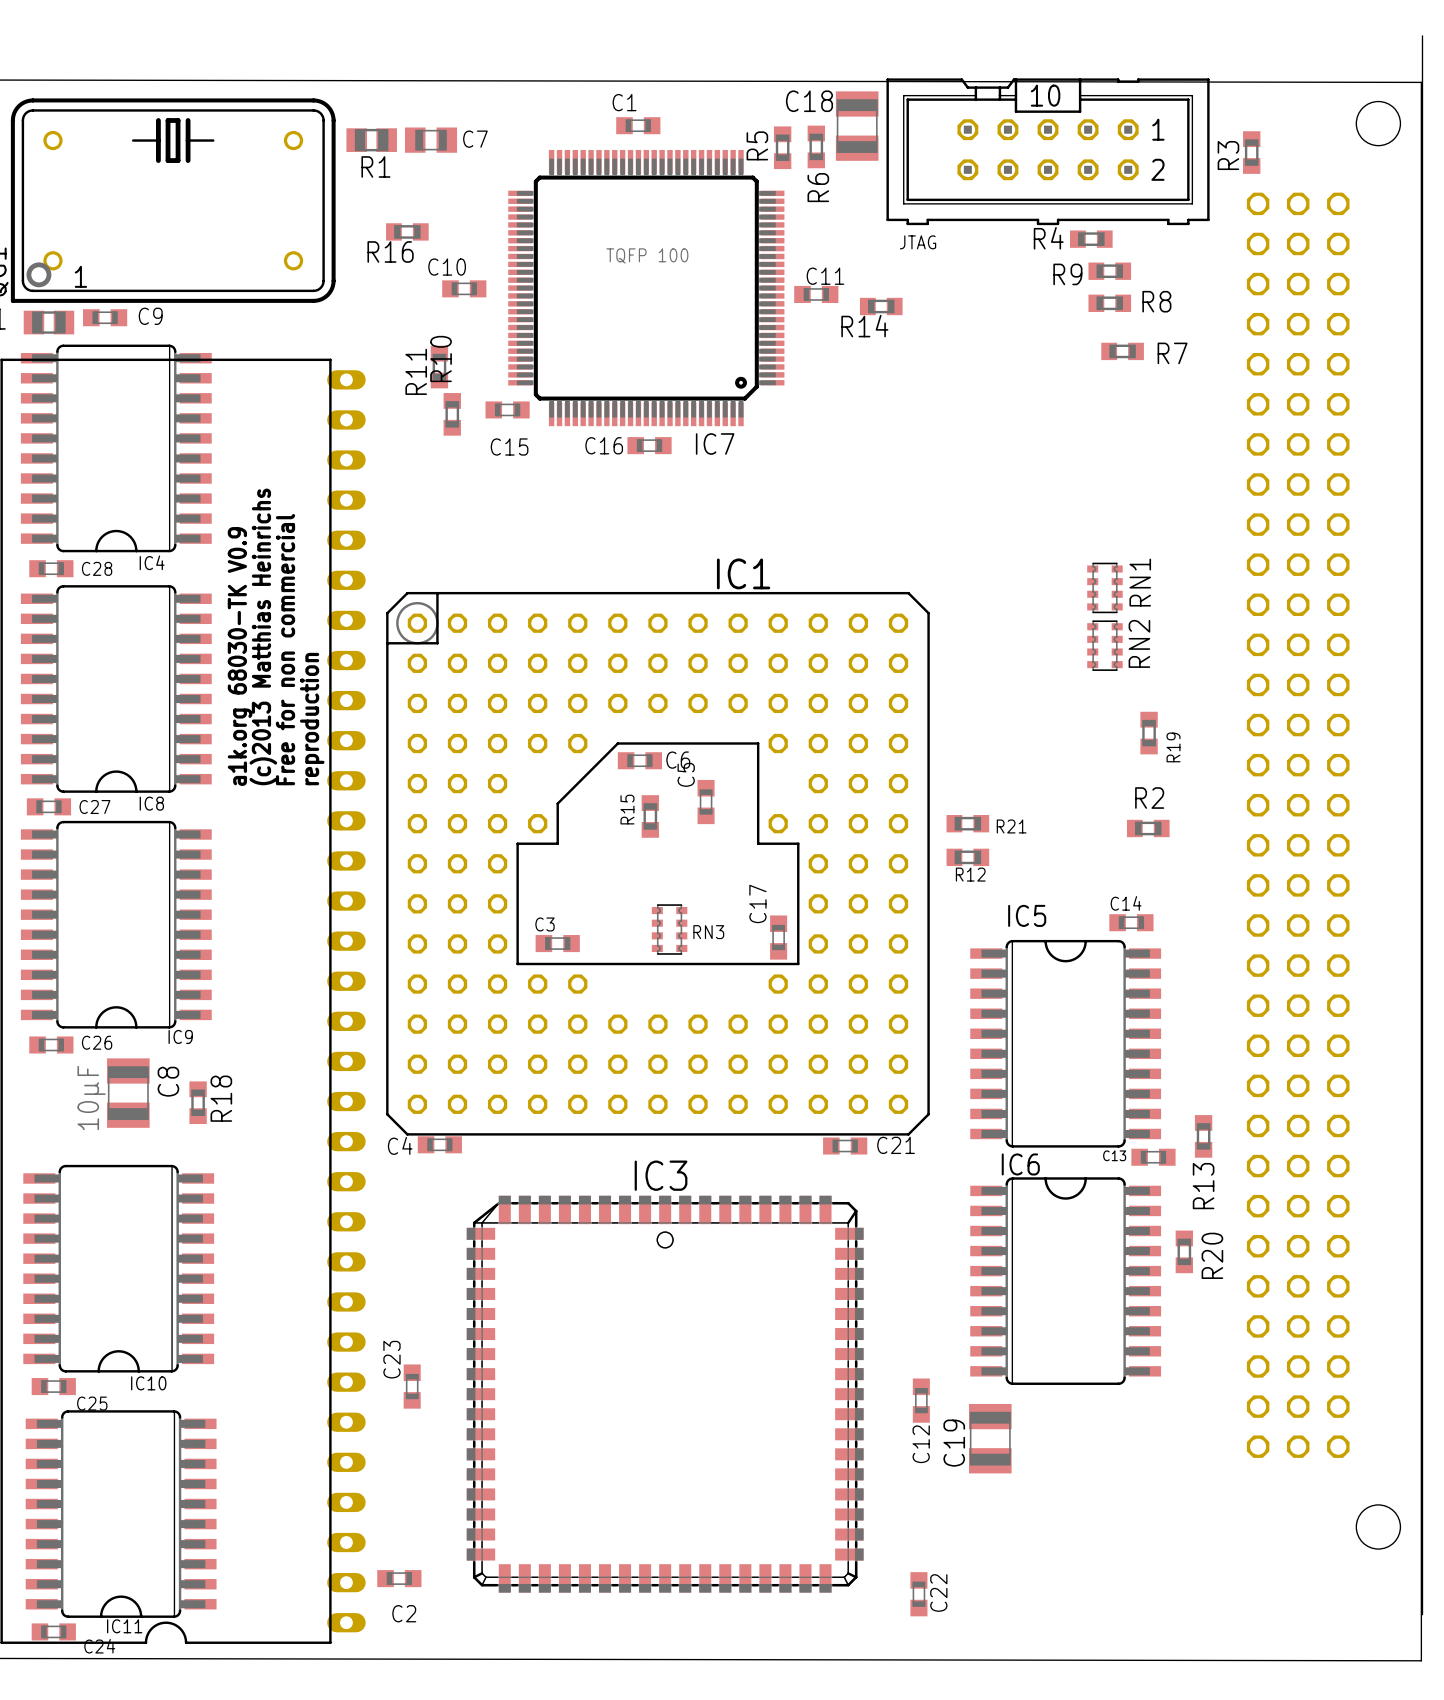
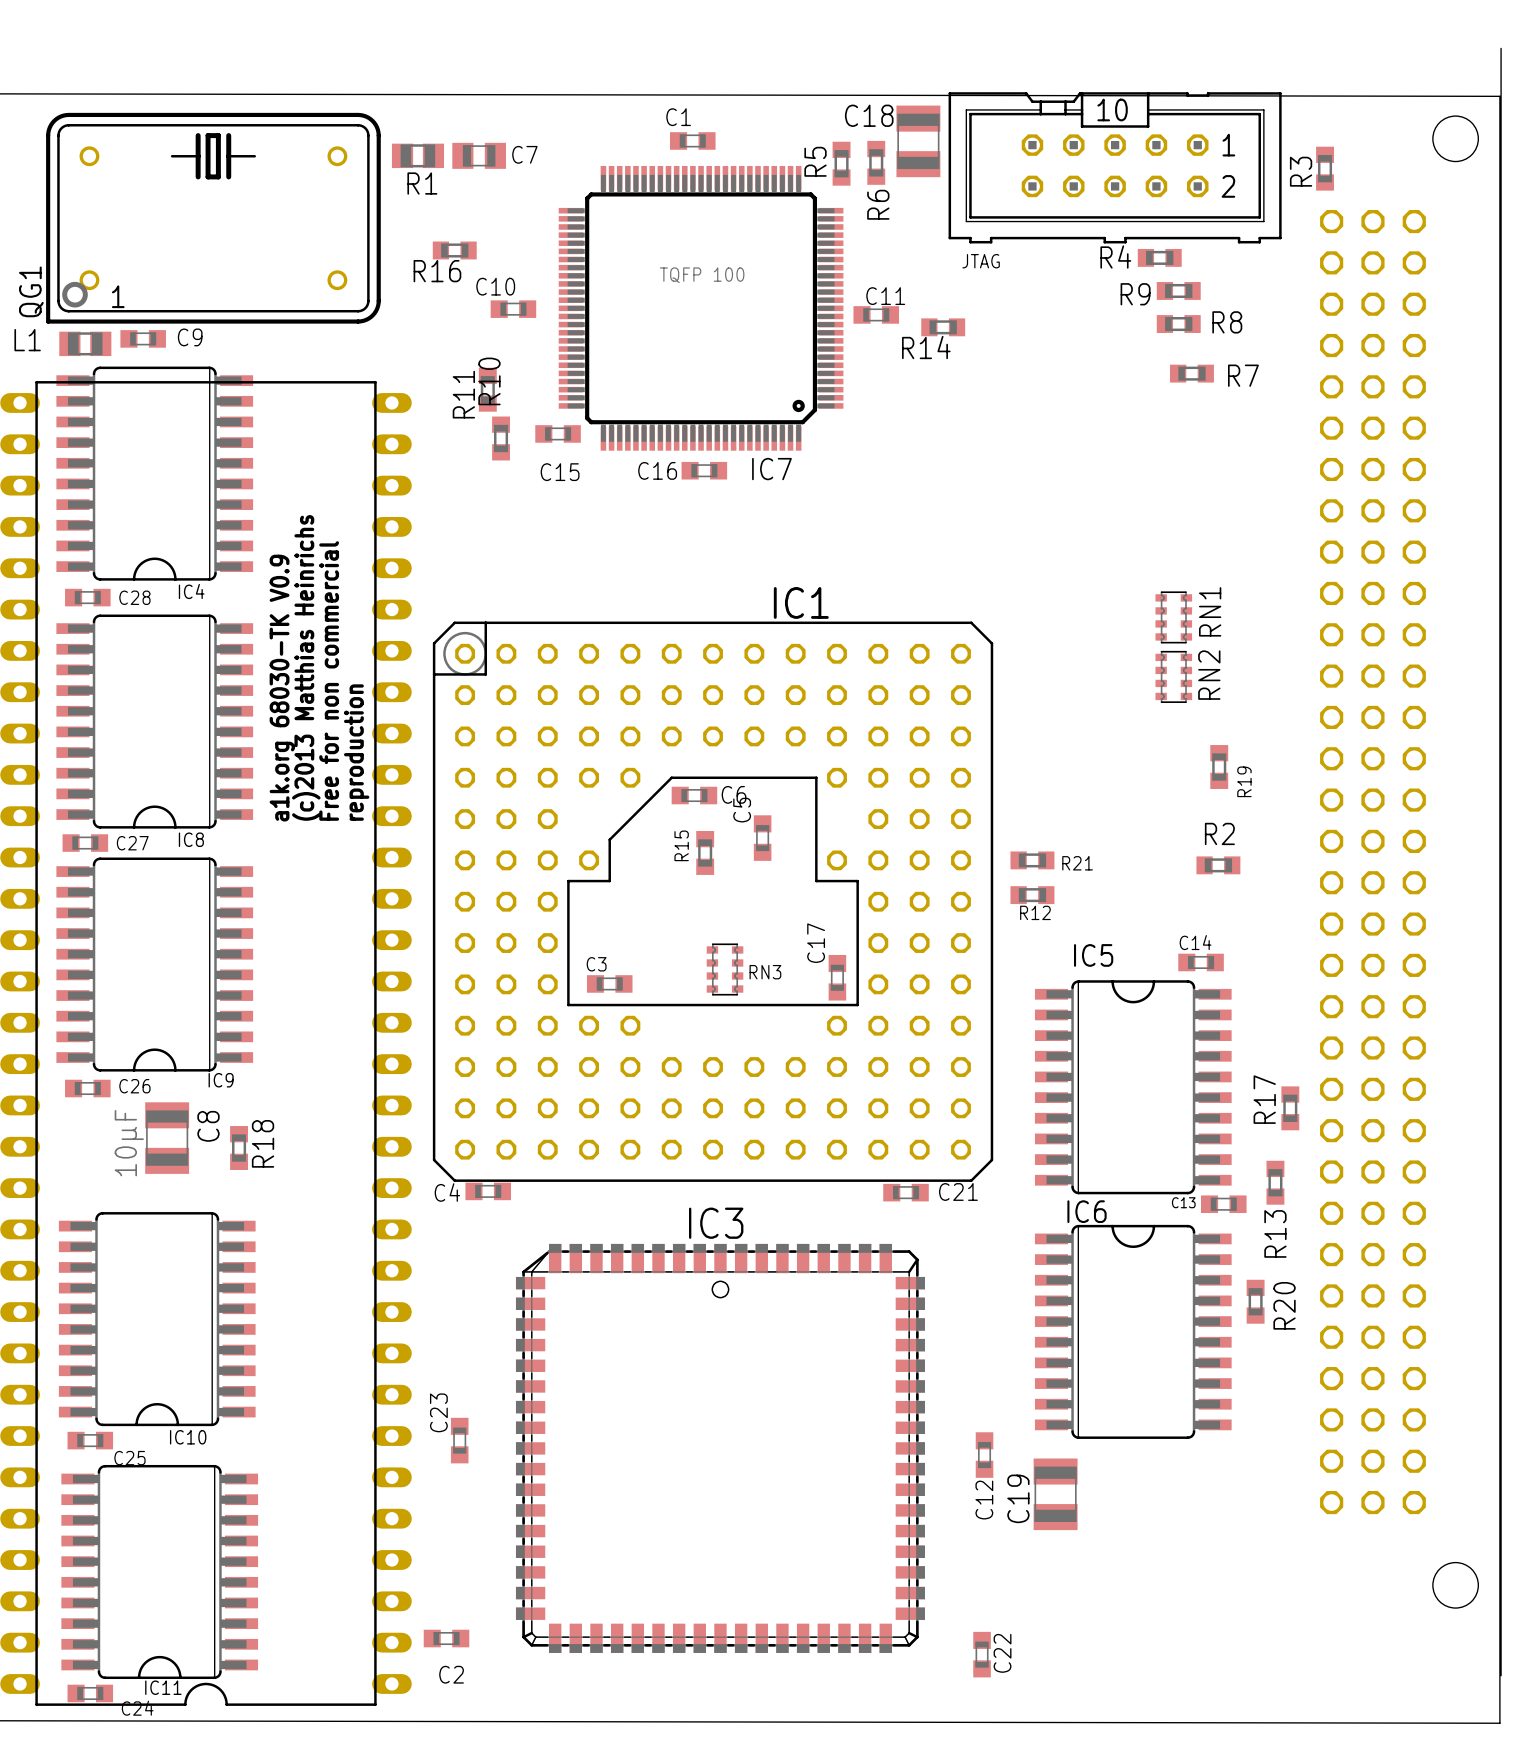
R17: none -> (1290, 1108)

